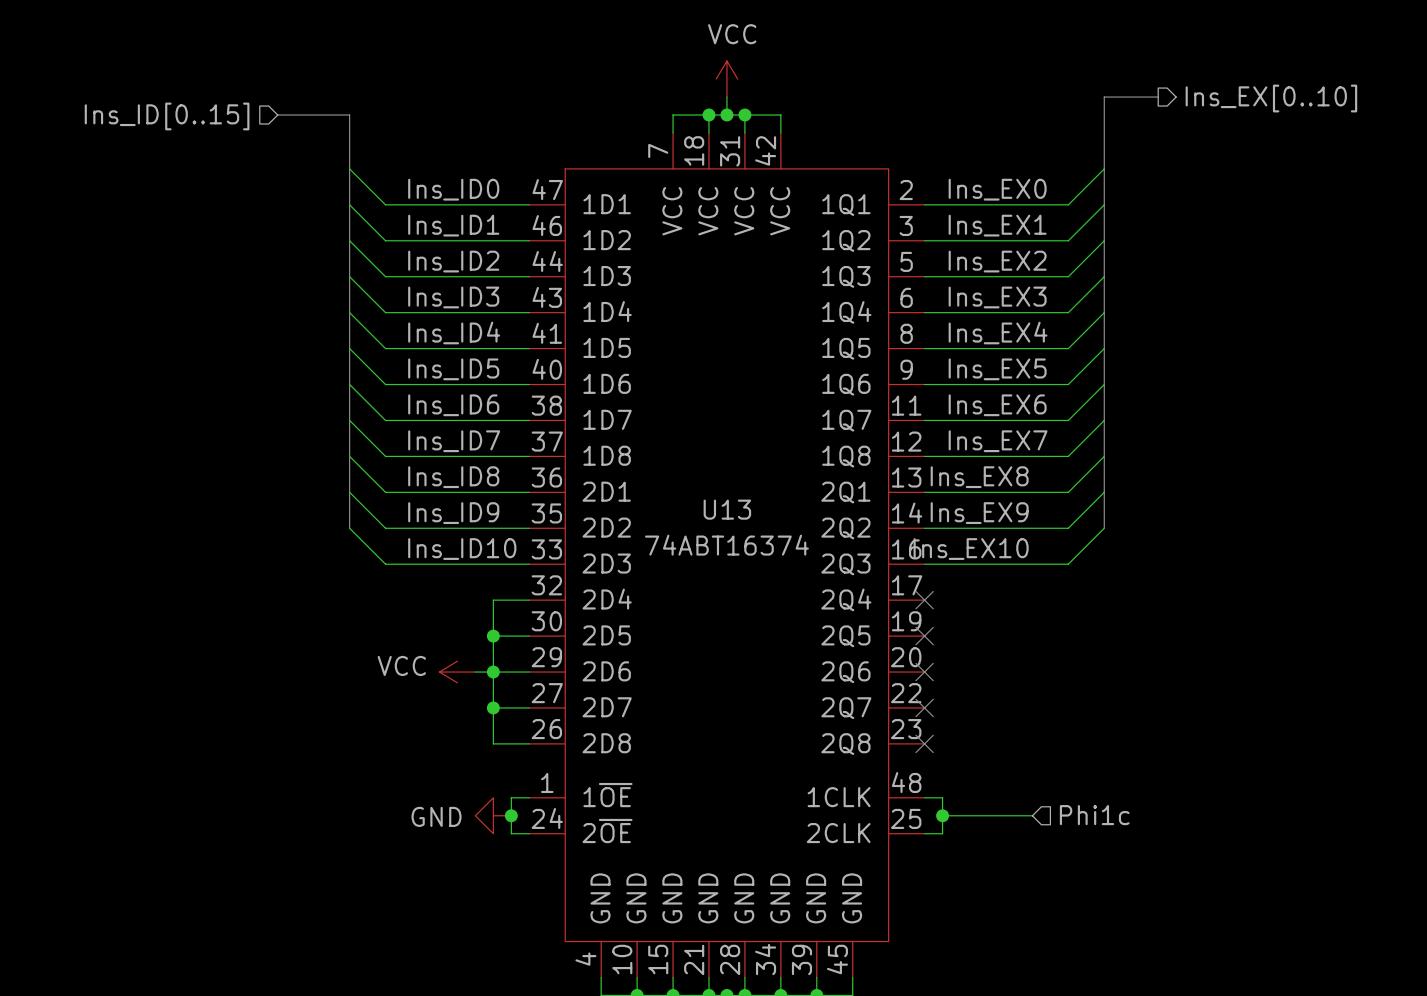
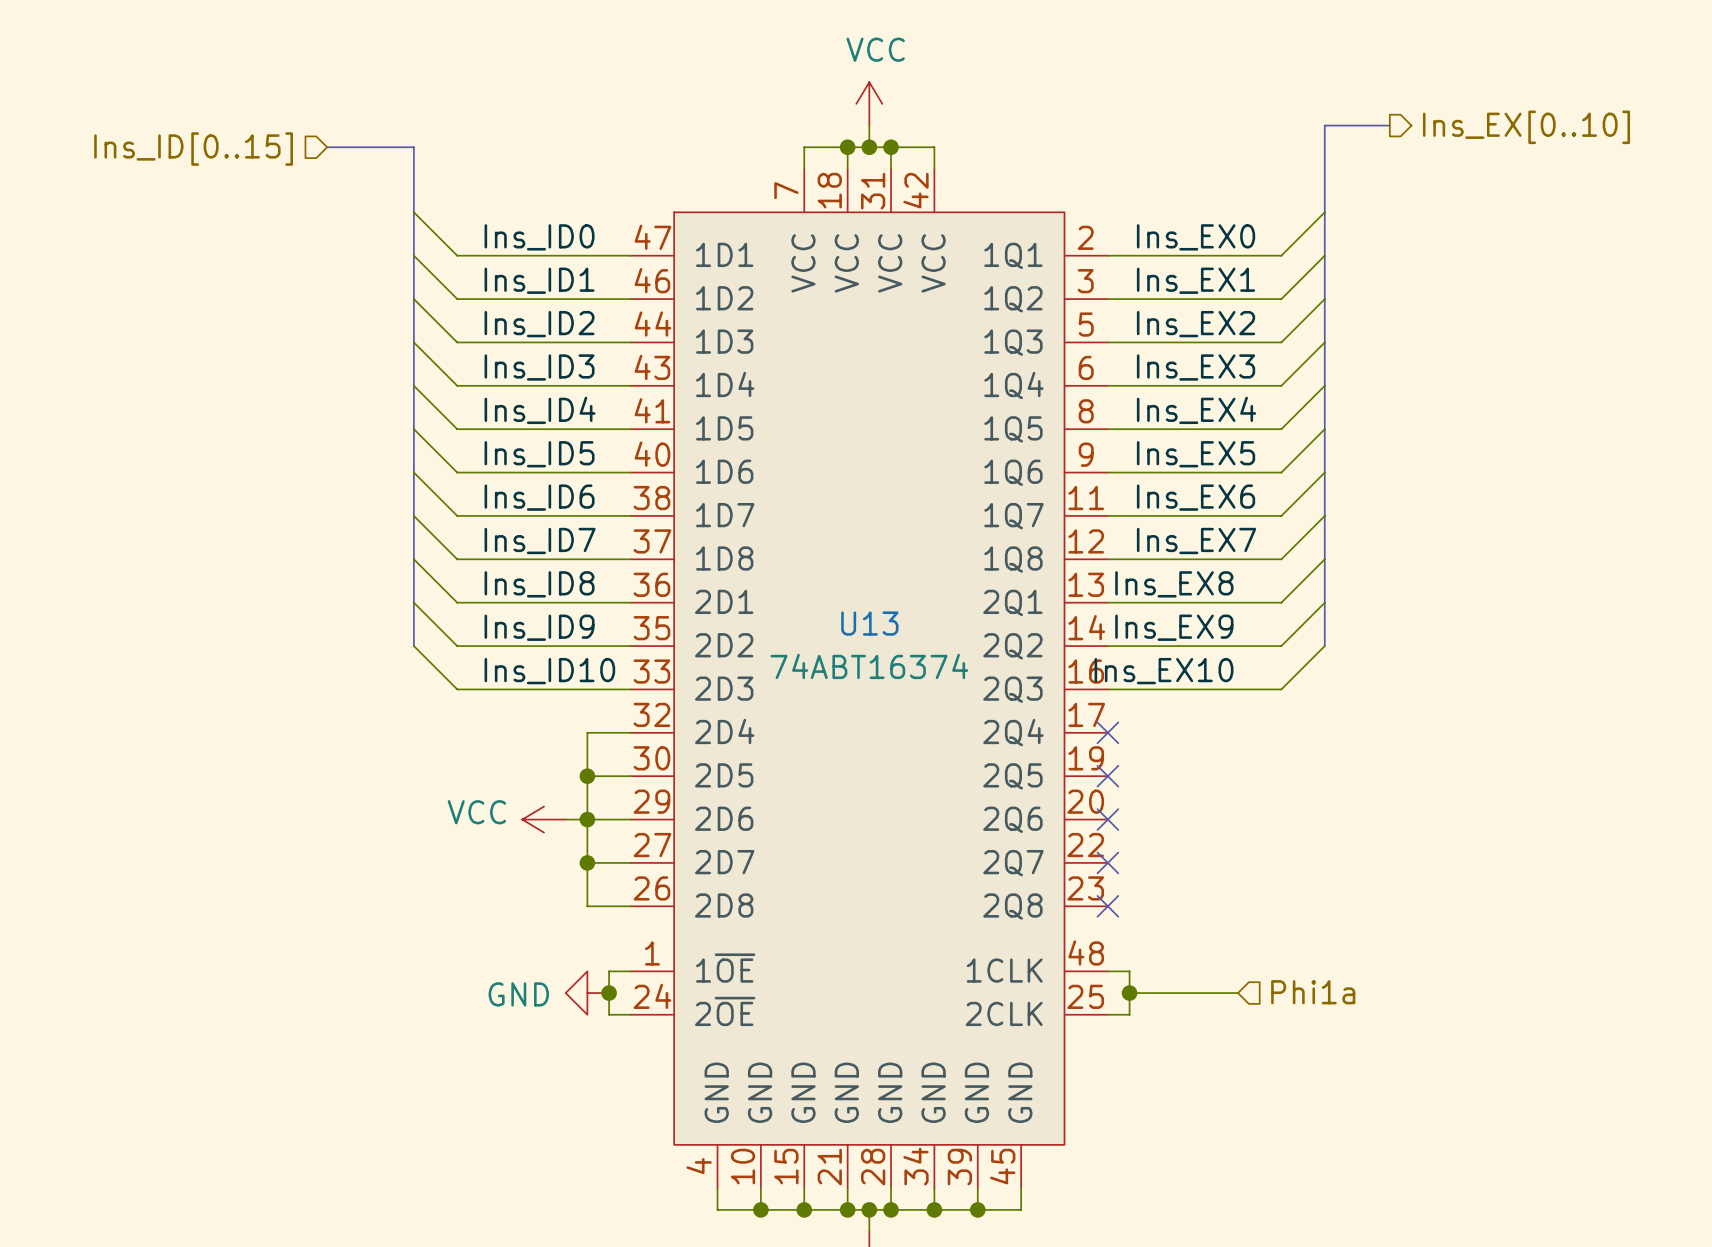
hierarchical label: Phi1c (1094, 815) -> Phi1a (1313, 992)

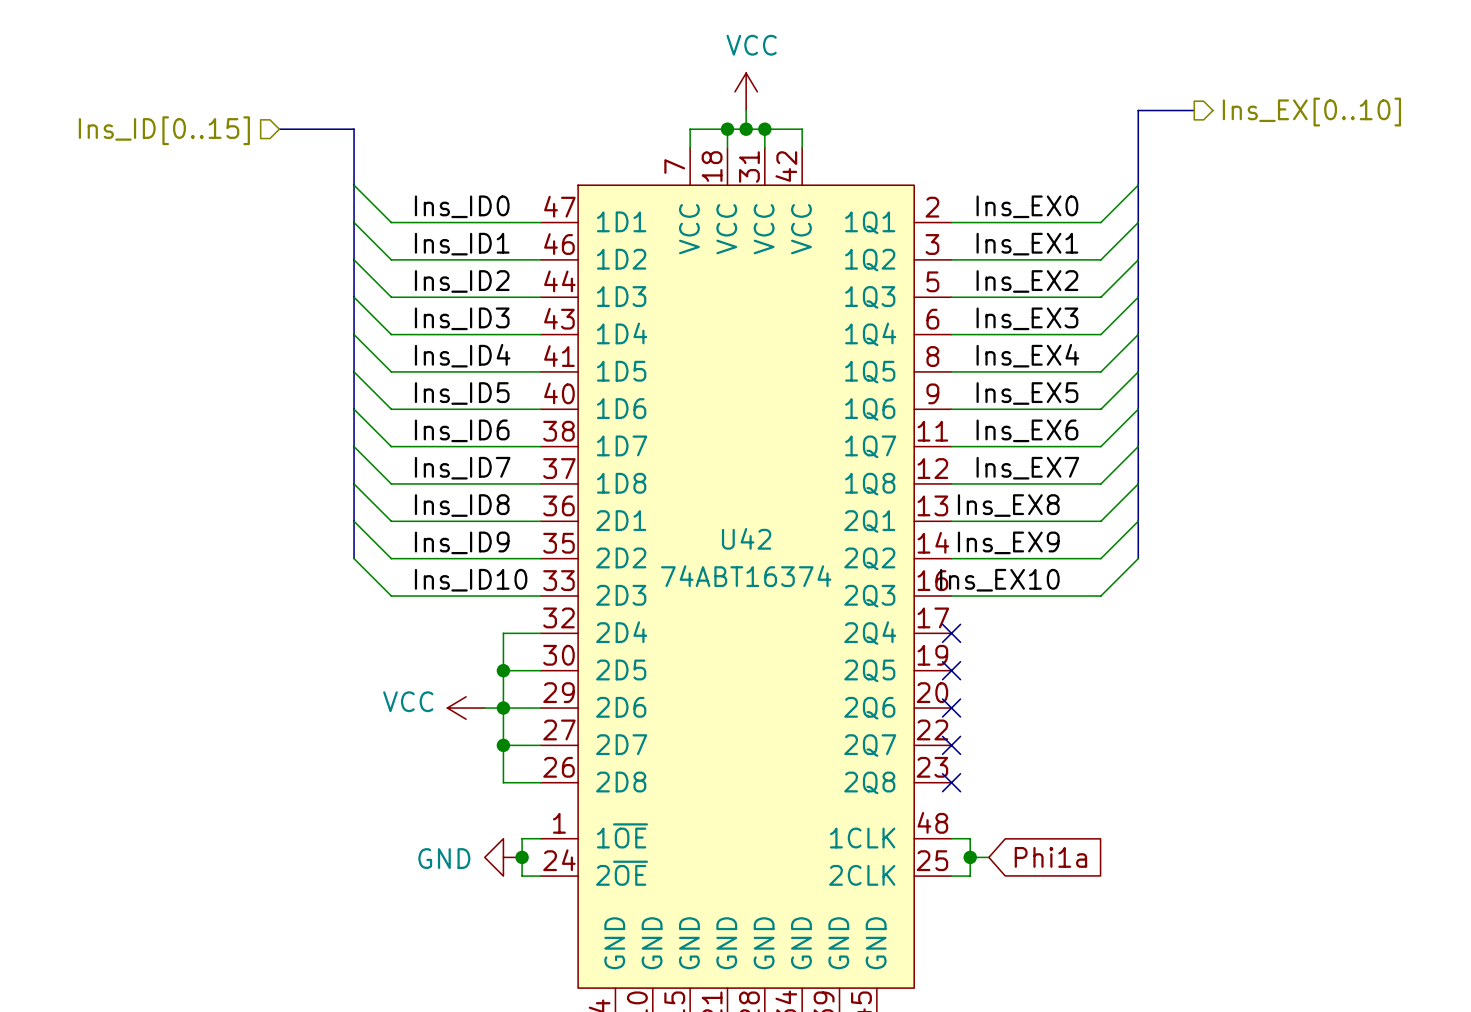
U13 name: U13 (869, 623) -> U42 (746, 538)
hierarchical label: Phi1a (1313, 992) -> none
wire: (1151, 993) (1238, 993) -> none
global label: none -> Phi1a (1050, 857)

